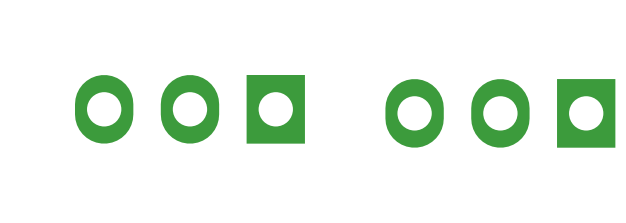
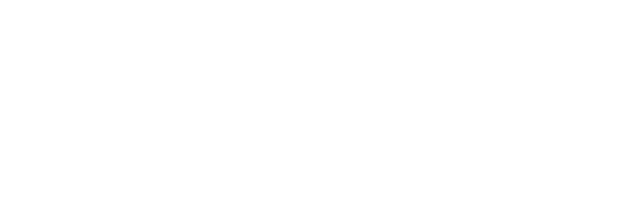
part: (189, 109) -> none
part: (500, 113) -> none

